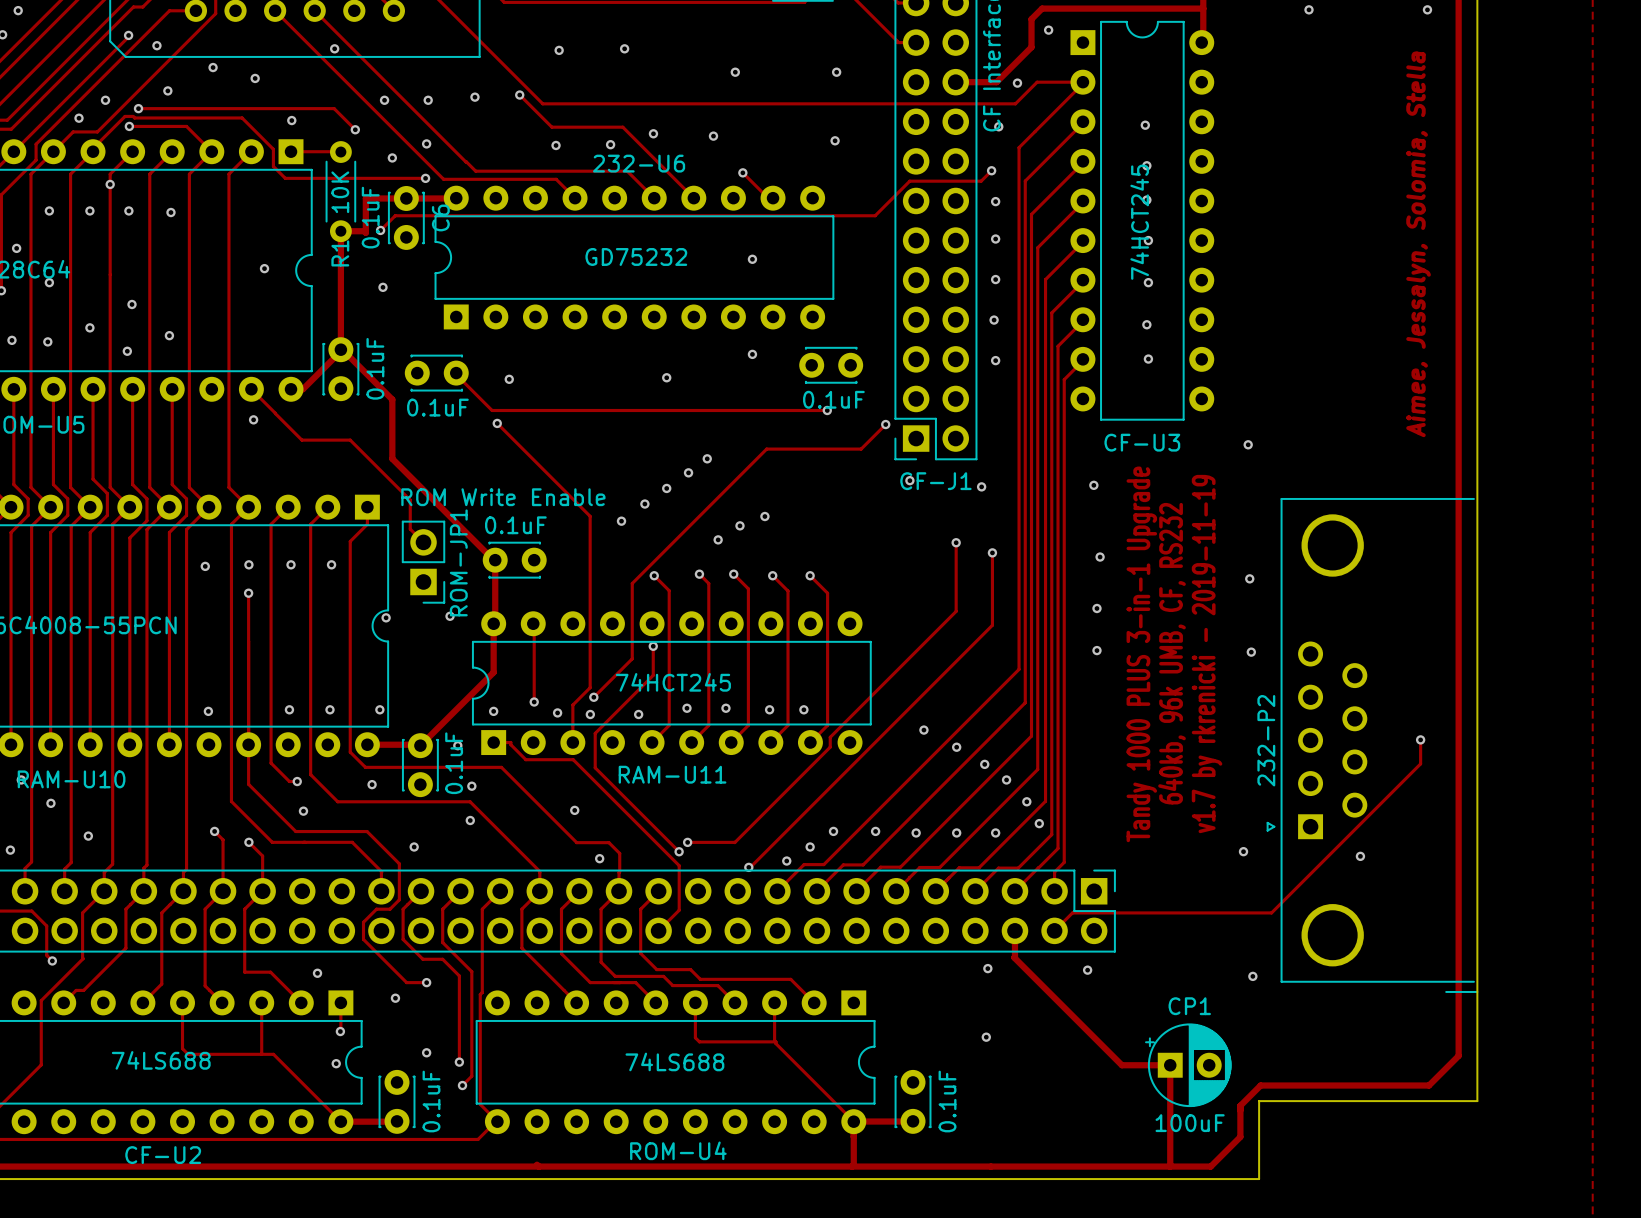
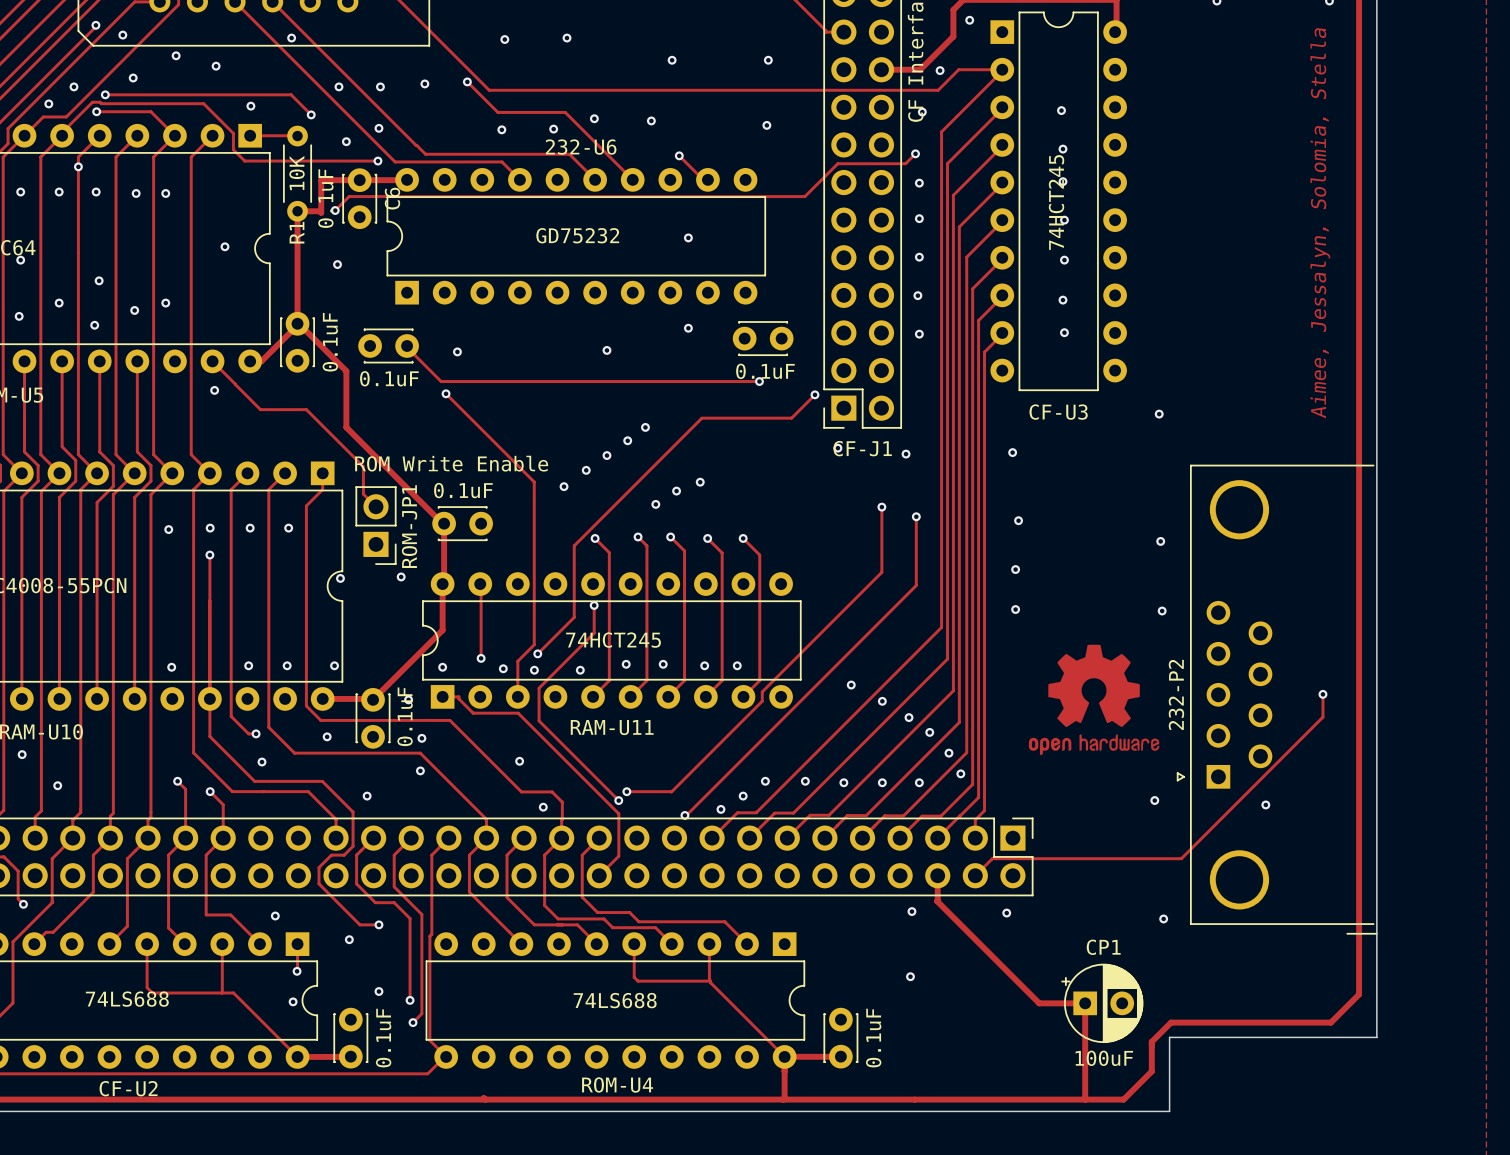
via: none -> (165, 193)
via: none -> (165, 303)
text: 640kb, 96k UMB, CF, RS232 (1172, 653) -> none
text: Tandy 1000 PLUS 3-in-1 Upgrade (1141, 654) -> none
text: v1.7 by rkrenicki - 2019-11-19 (1207, 654) -> none
drawing: none -> [1028, 644, 1160, 756]

